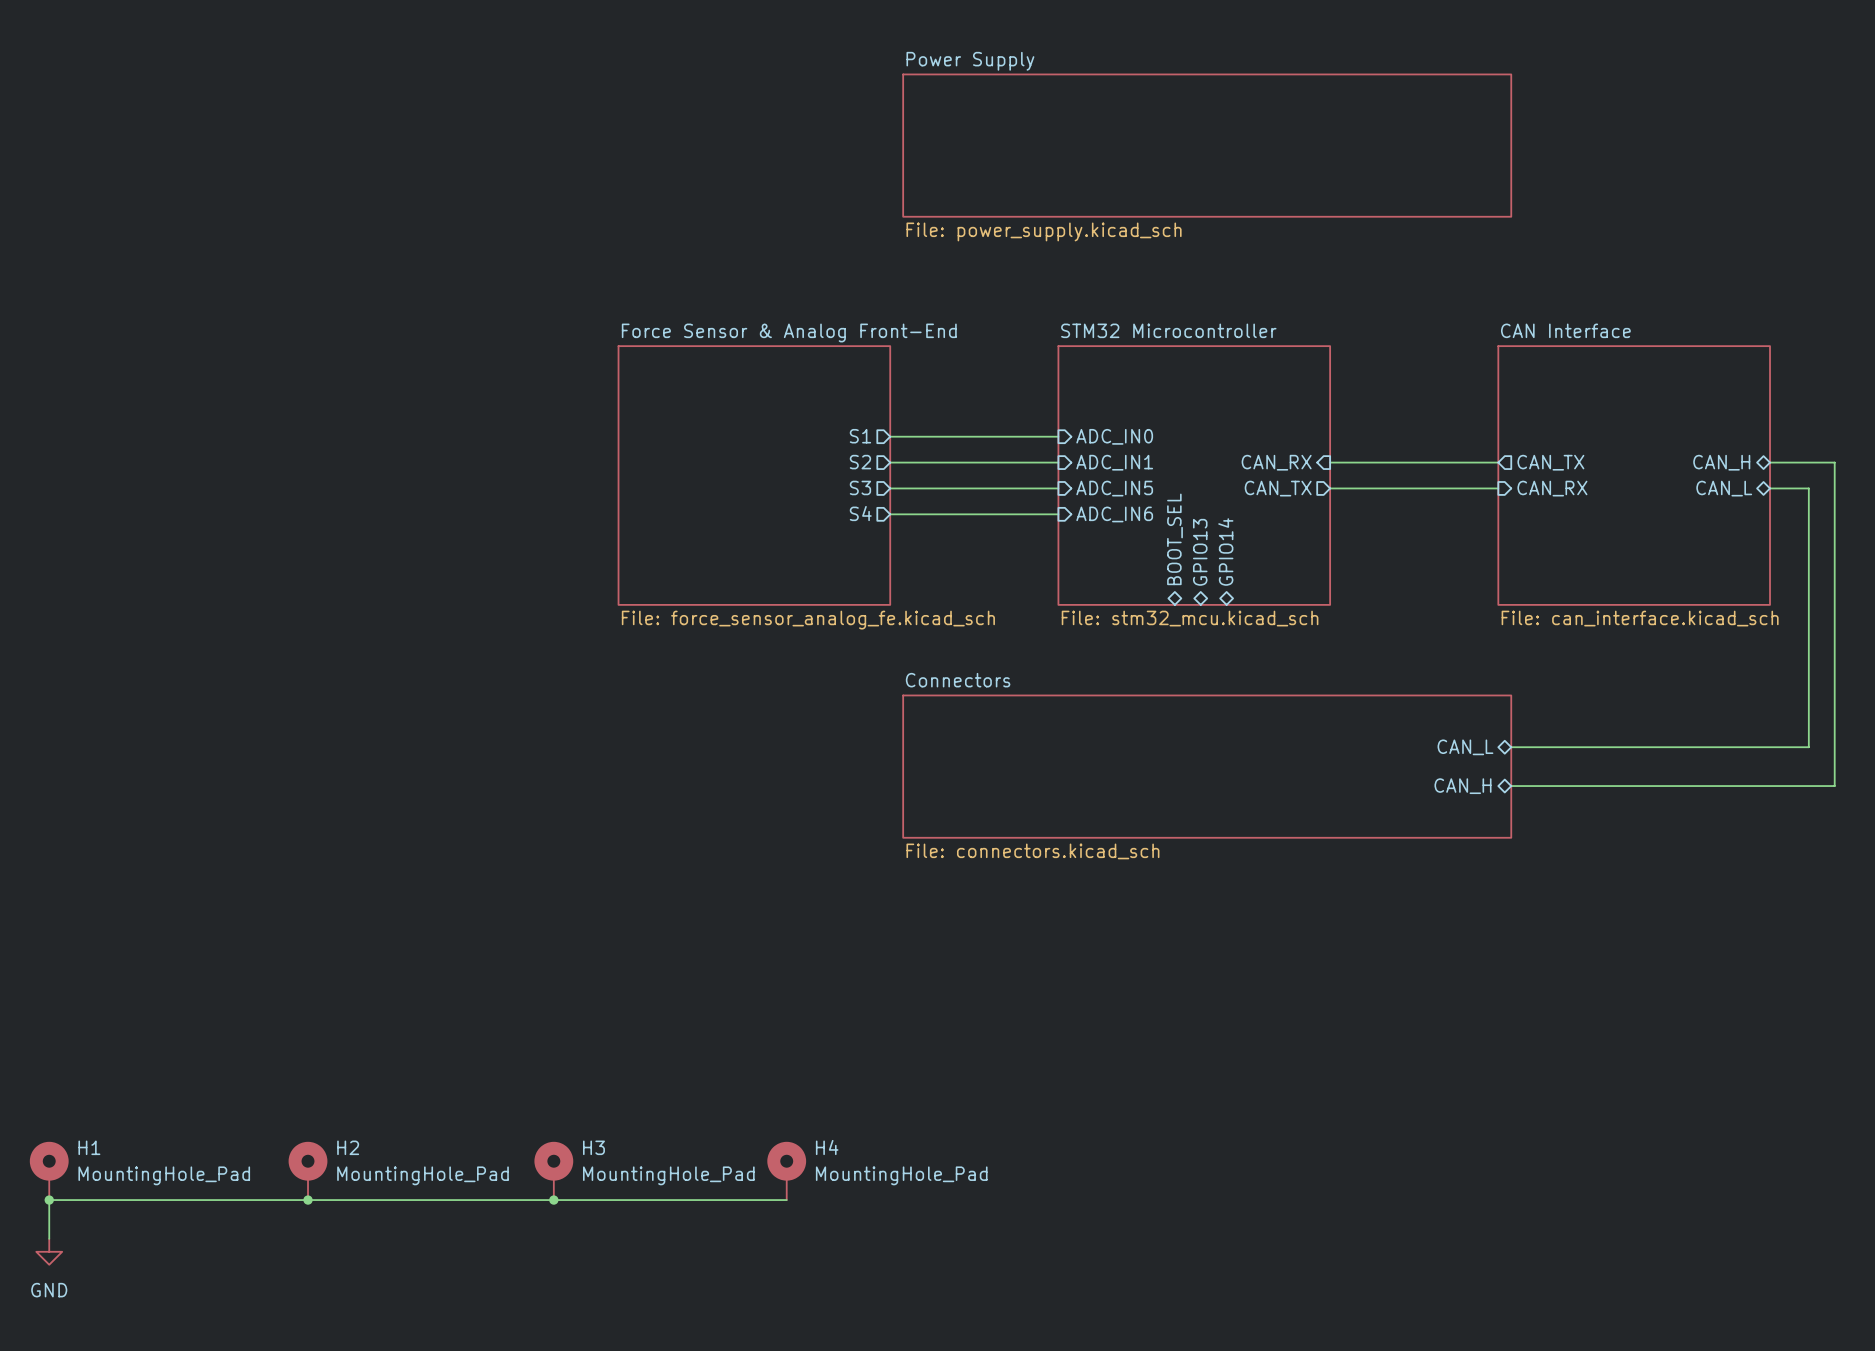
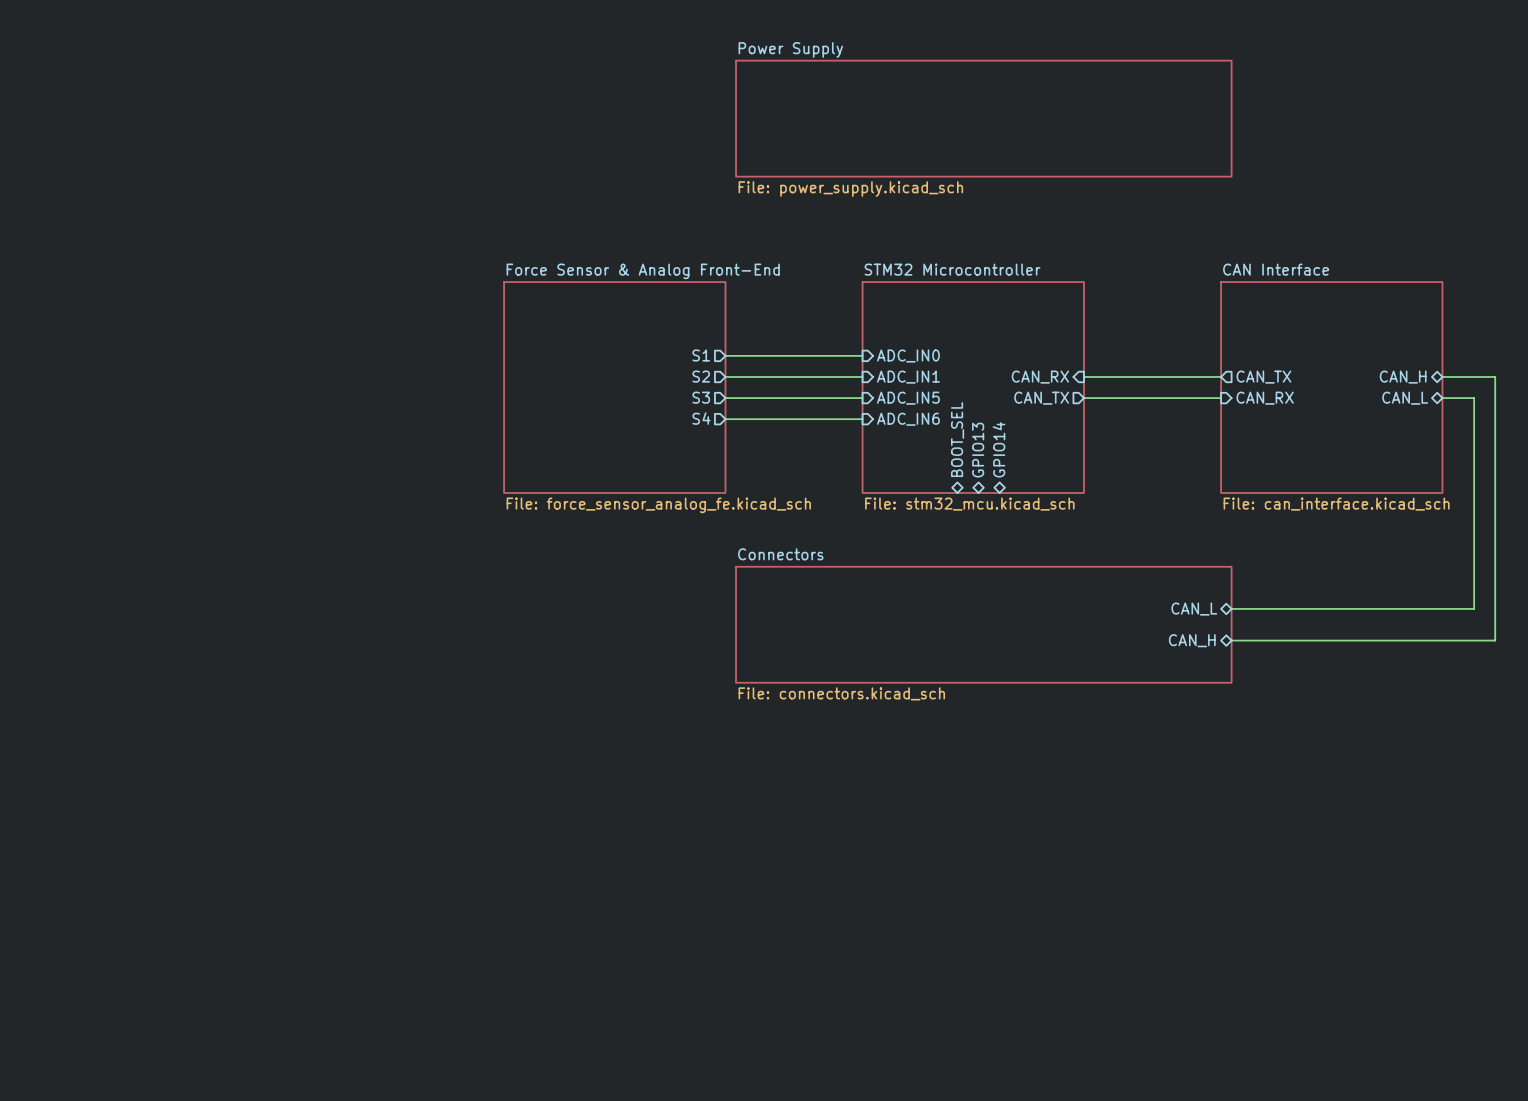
H1: MountingHole_Pad (49, 1170) -> none
H2: MountingHole_Pad (308, 1170) -> none
H3: MountingHole_Pad (553, 1170) -> none
H4: MountingHole_Pad (786, 1170) -> none
junction: (49, 1200) -> none
junction: (308, 1200) -> none
junction: (553, 1200) -> none
wire: (786, 1200) (49, 1200) (49, 1238) -> none
power symbol: GND (49, 1251) -> none

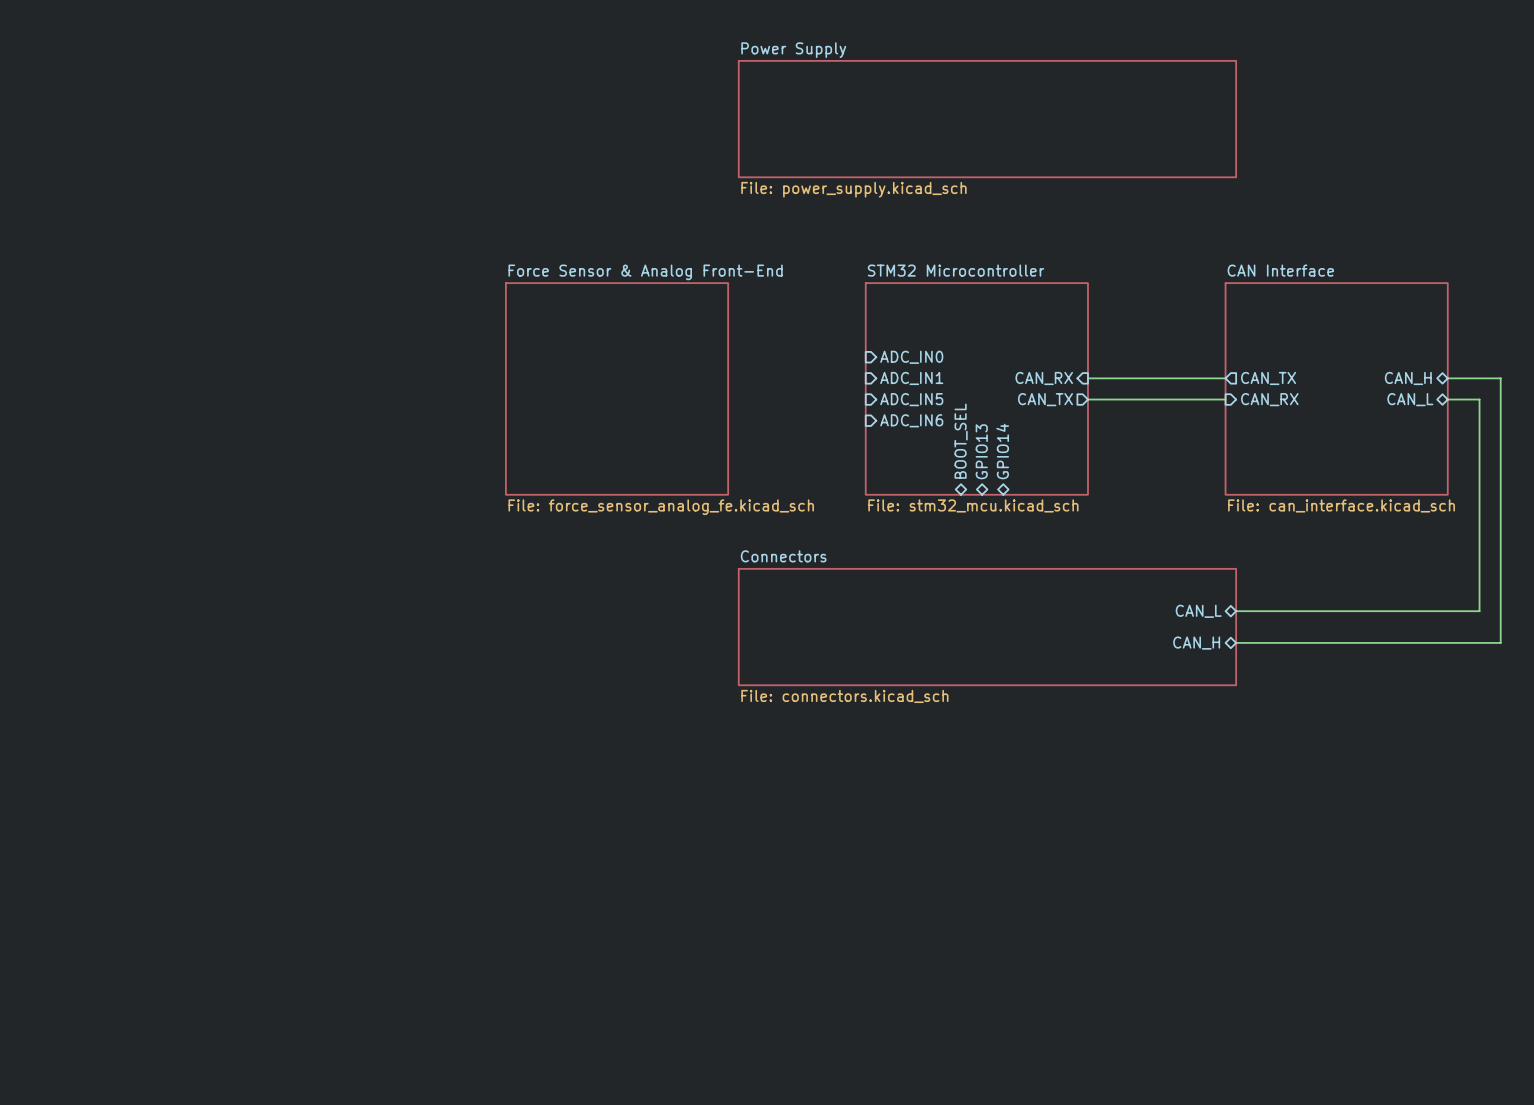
sheet pin: S1 (701, 355) -> none
wire: (725, 355) (862, 355) -> none
sheet pin: S2 (701, 376) -> none
wire: (725, 376) (862, 376) -> none
sheet pin: S3 (701, 397) -> none
wire: (725, 398) (862, 398) -> none
sheet pin: S4 (701, 418) -> none
wire: (725, 419) (862, 419) -> none

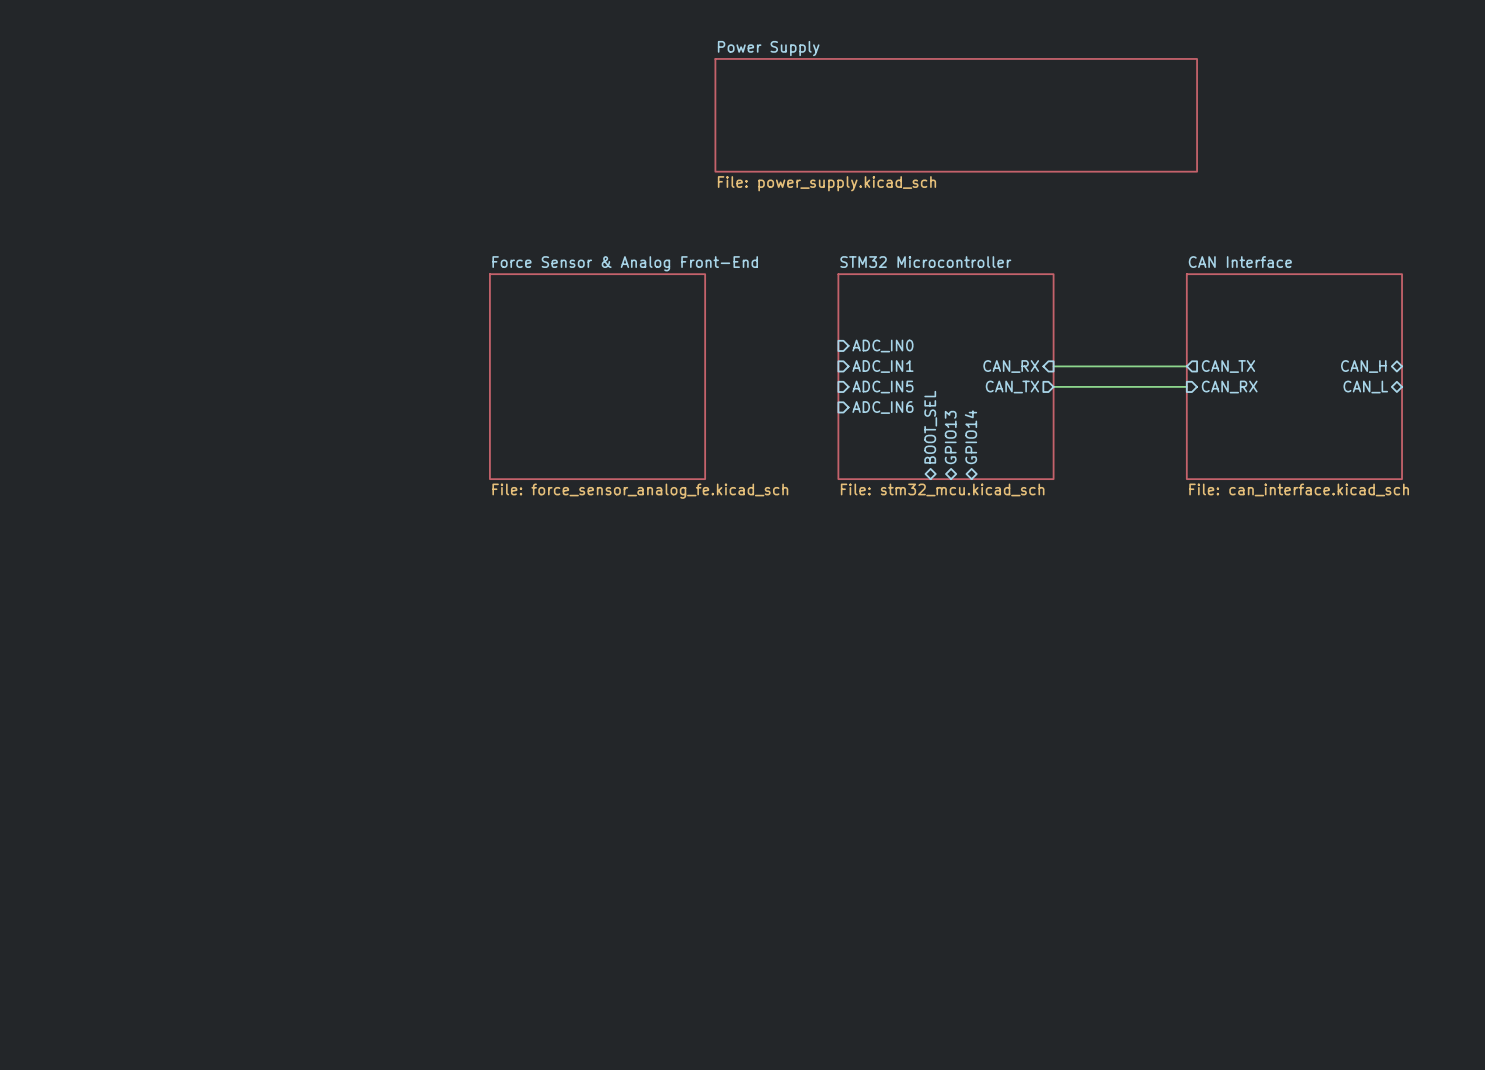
wire: (1447, 378) (1500, 378) (1500, 642) (1236, 642) -> none
wire: (1447, 399) (1479, 399) (1479, 611) (1236, 611) -> none
sheet pin: CAN_L (1198, 611) -> none
sheet Connectors: File: connectors.kicad_sch (987, 627) -> none
sheet pin: CAN_H (1196, 643) -> none

